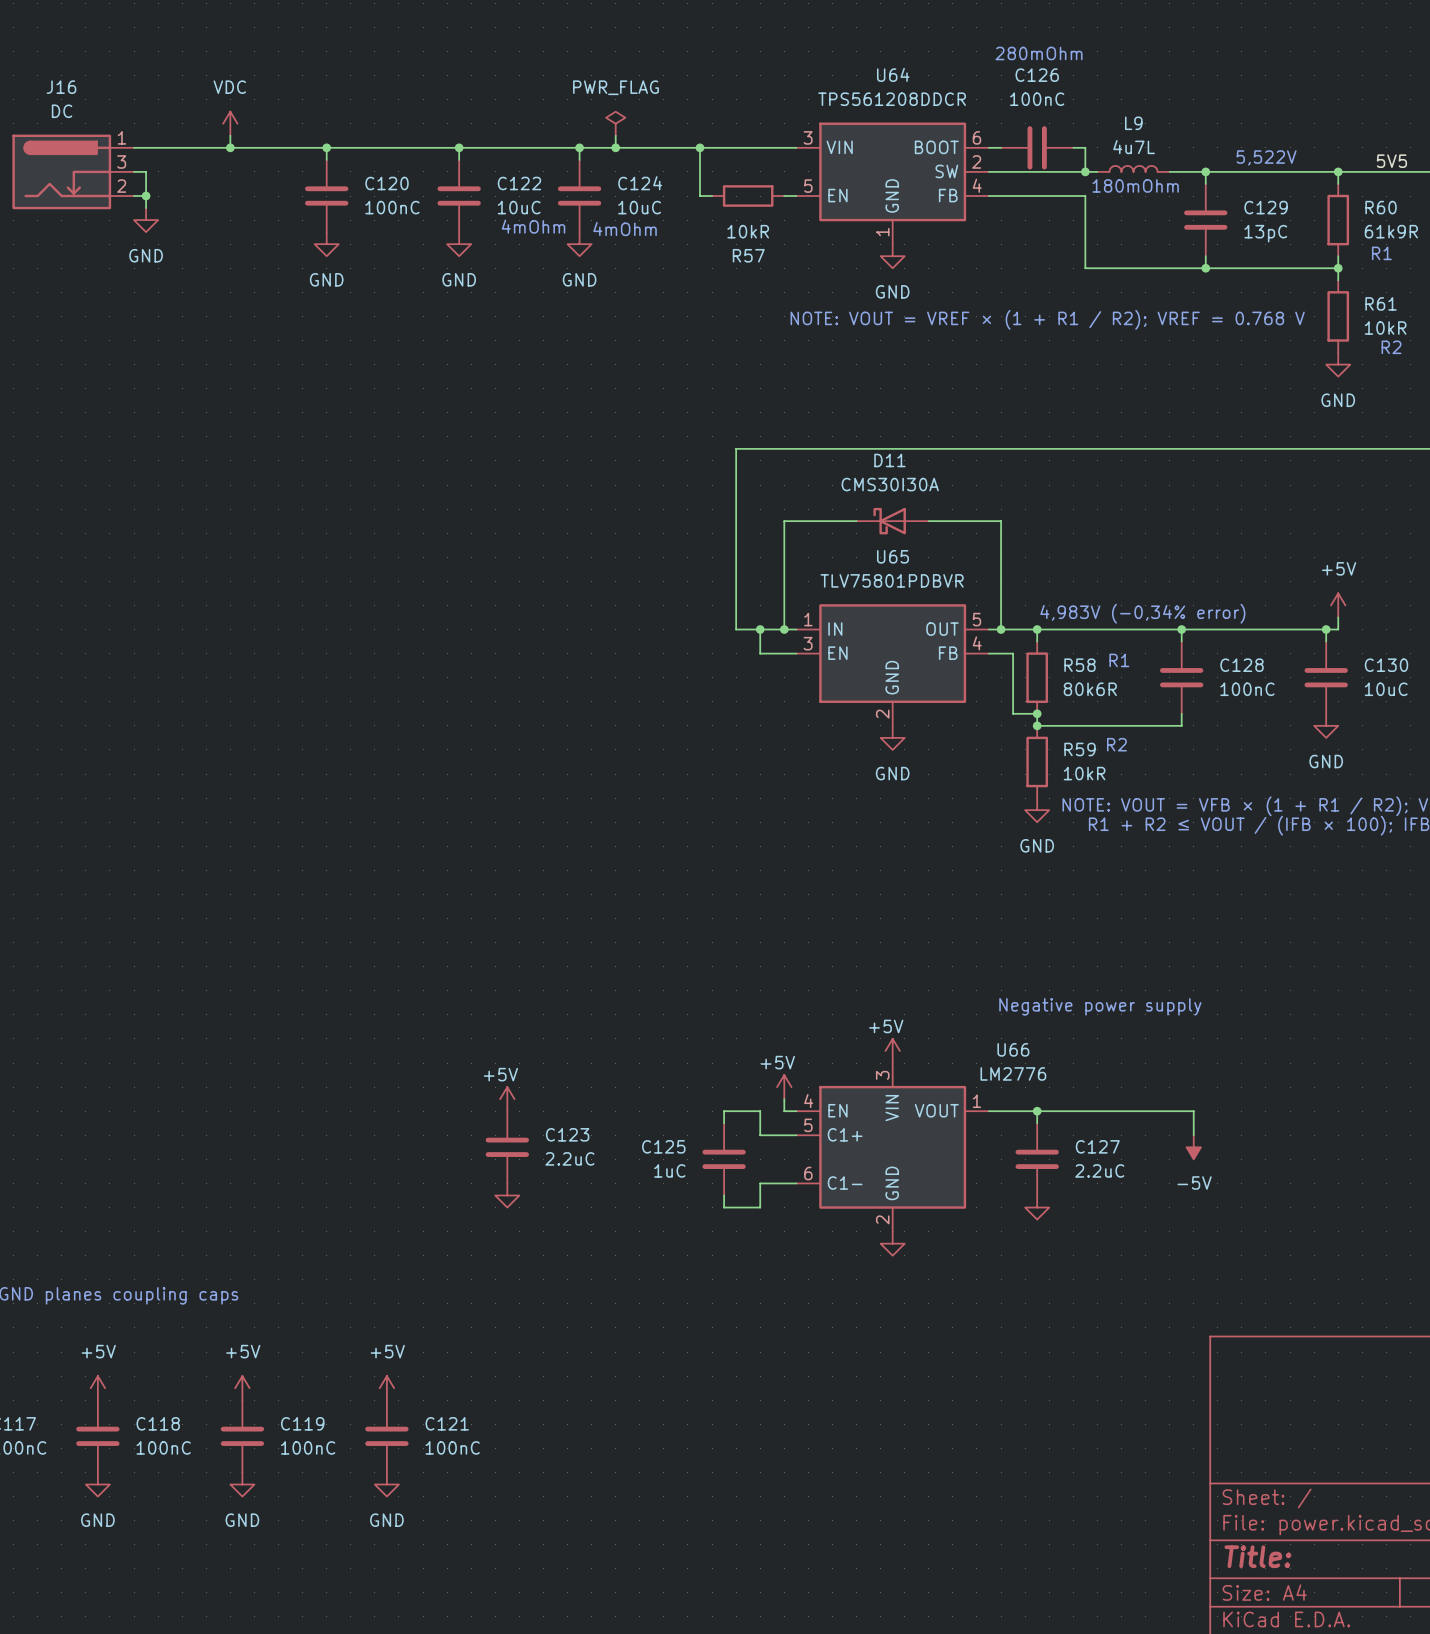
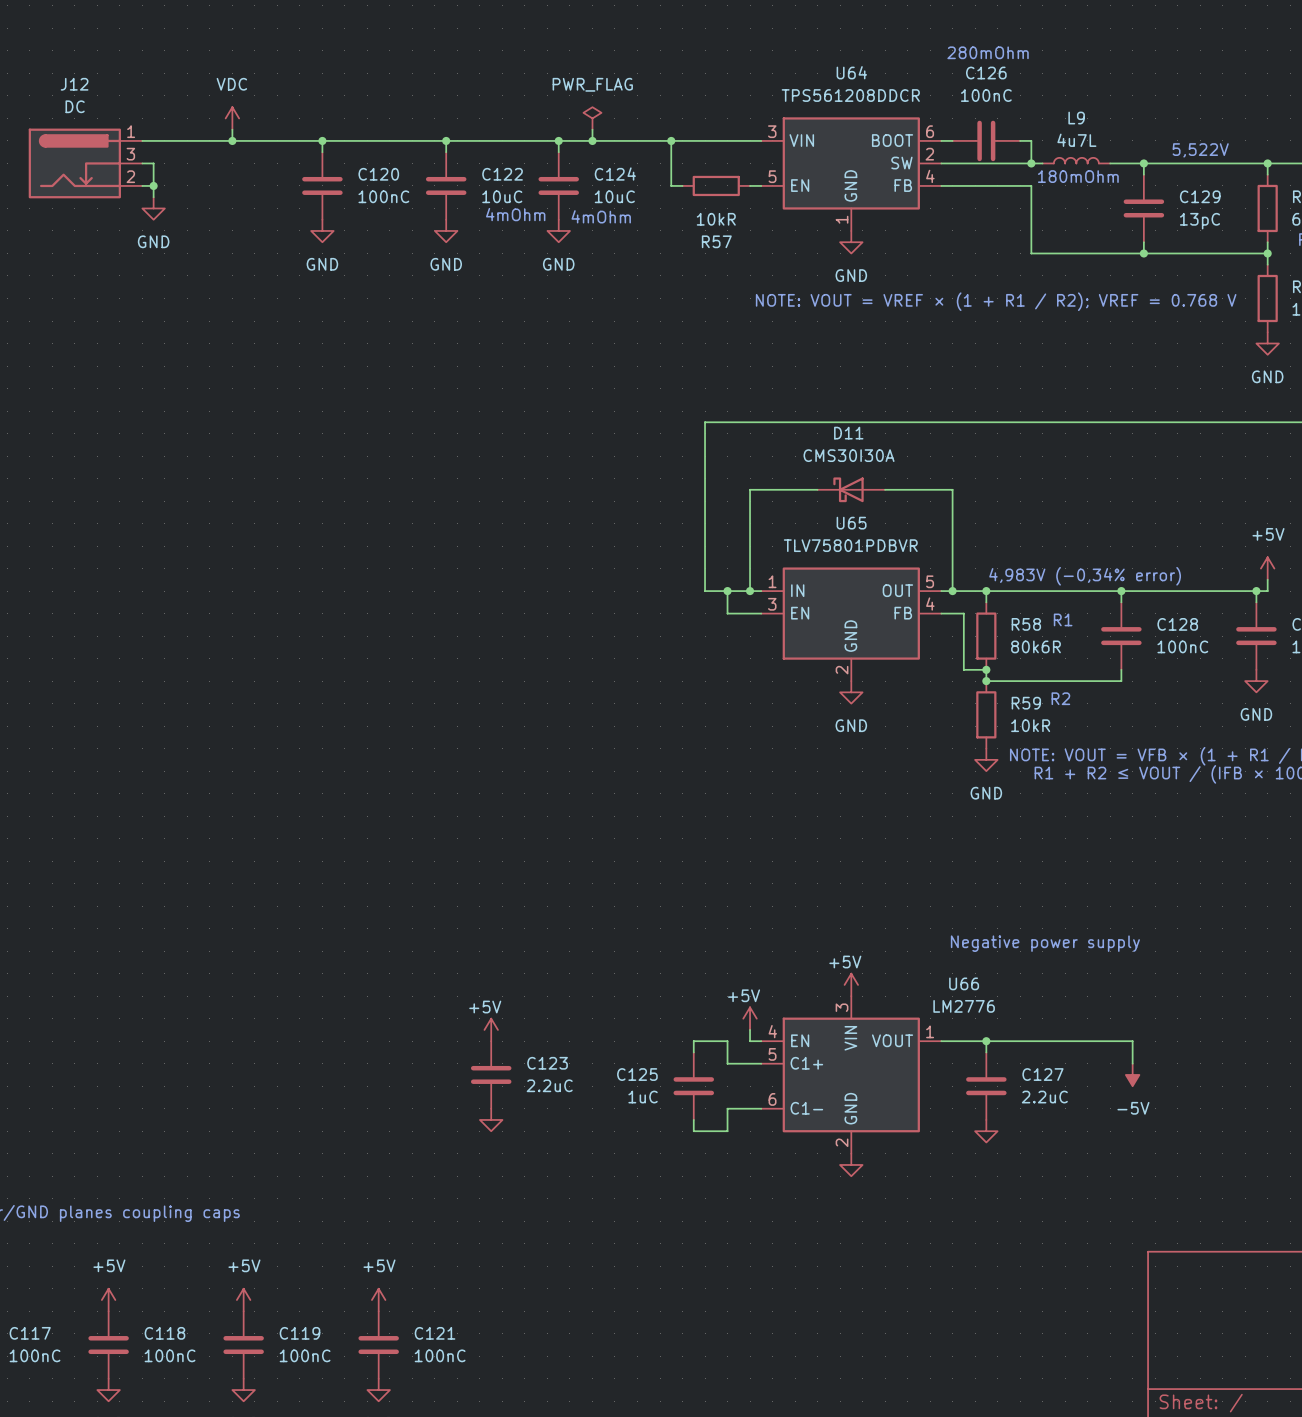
J16 name: J16 (61, 87) -> J12 (74, 84)

